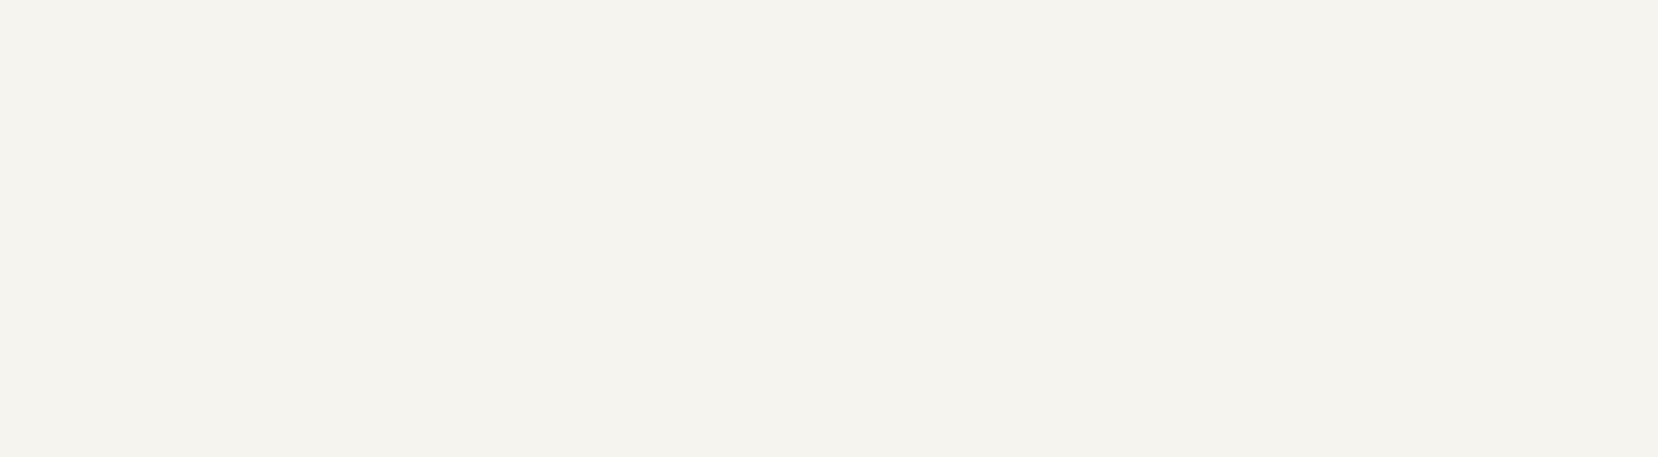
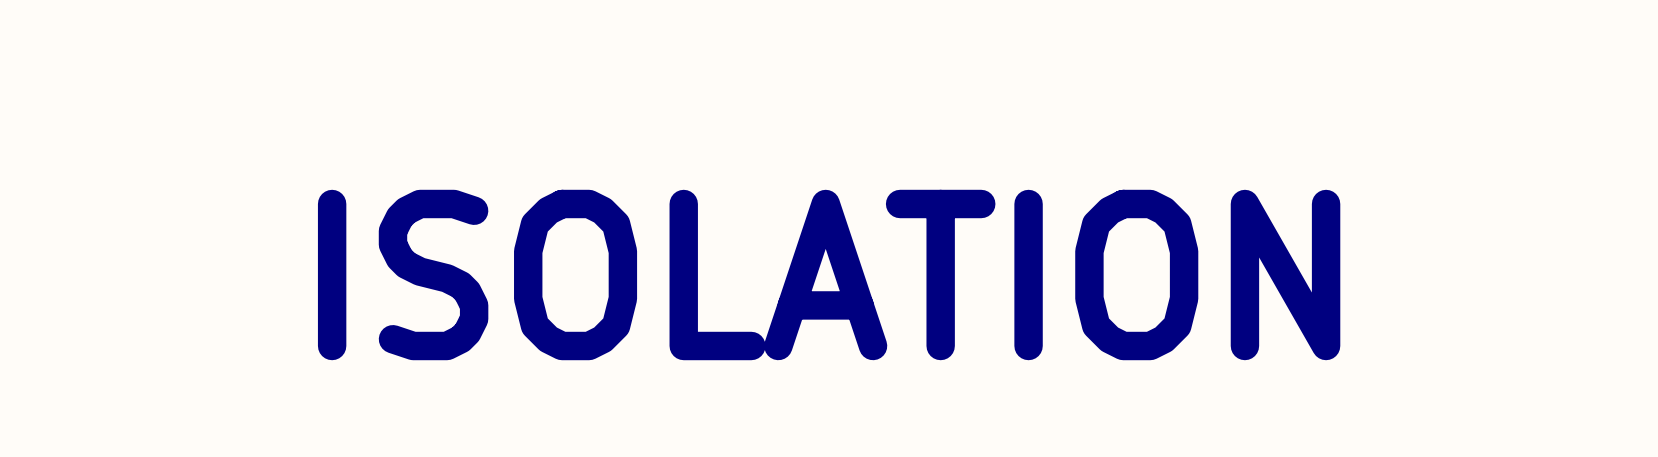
text: none -> ISOLATION (829, 275)

